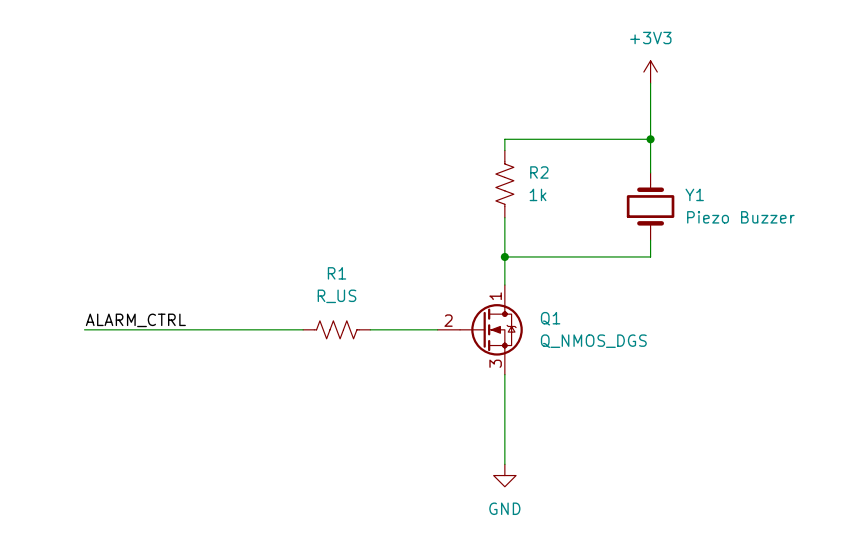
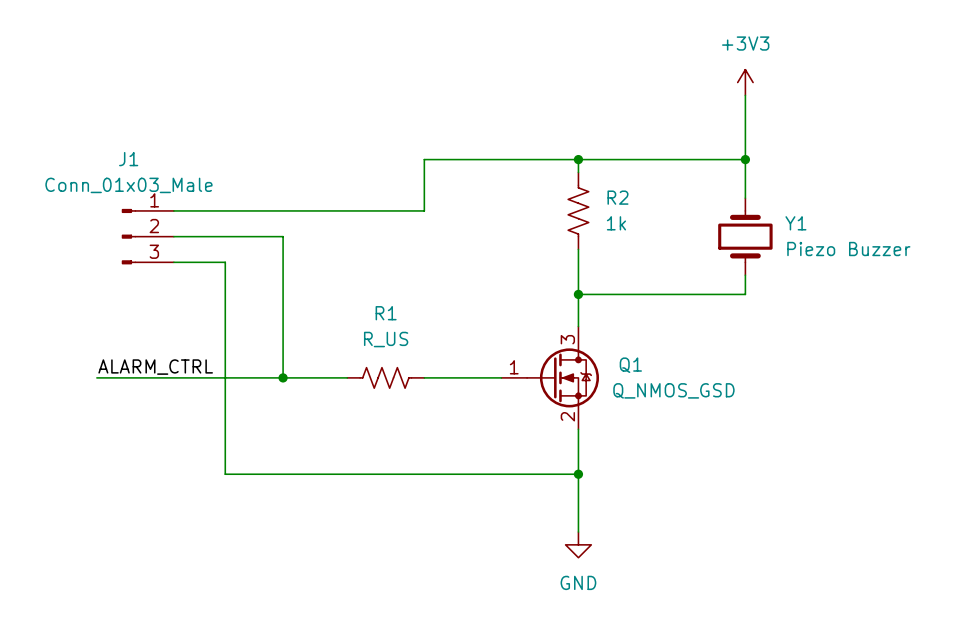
wire: none -> (578, 159) (424, 159) (424, 210) (173, 210)
junction: none -> (578, 159)
J1: none -> Conn_01x03_Male (147, 236)
wire: none -> (173, 236) (283, 236) (283, 377)
wire: none -> (173, 262) (225, 262) (225, 474) (578, 474)
Q1 pin number: 1 (495, 296) -> 3 (567, 339)
Q1 pin number: 2 (448, 320) -> 1 (514, 367)
junction: none -> (283, 377)
Q1 value: Q_NMOS_DGS (593, 341) -> Q_NMOS_GSD (673, 390)
Q1 pin number: 3 (495, 363) -> 2 (567, 416)
junction: none -> (578, 474)

